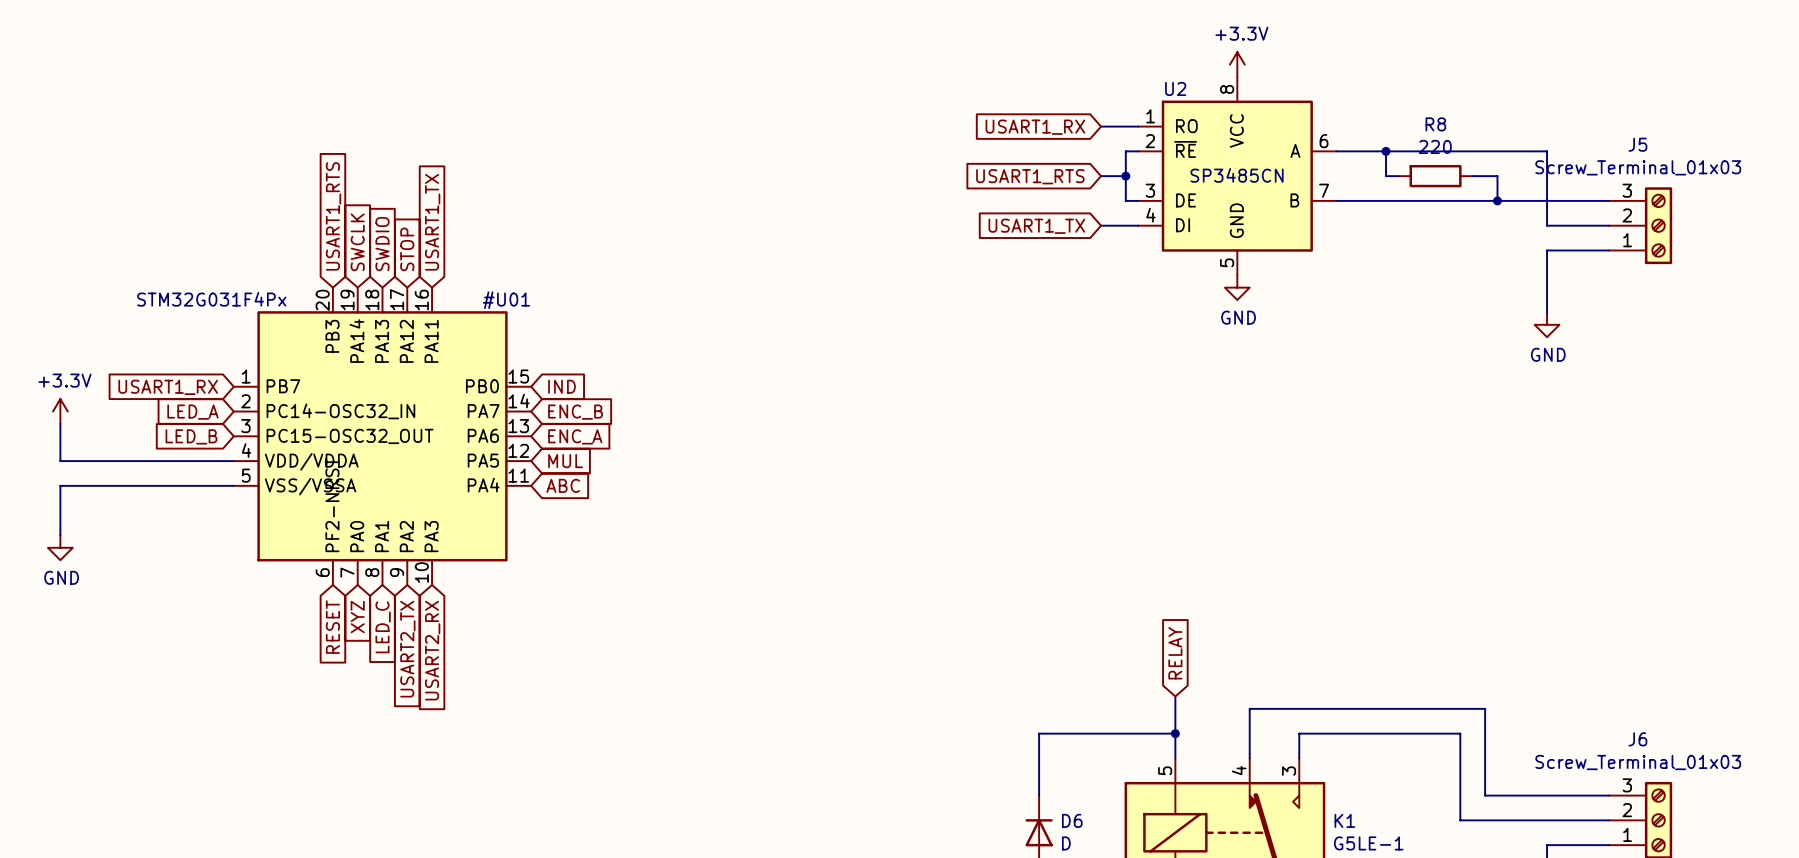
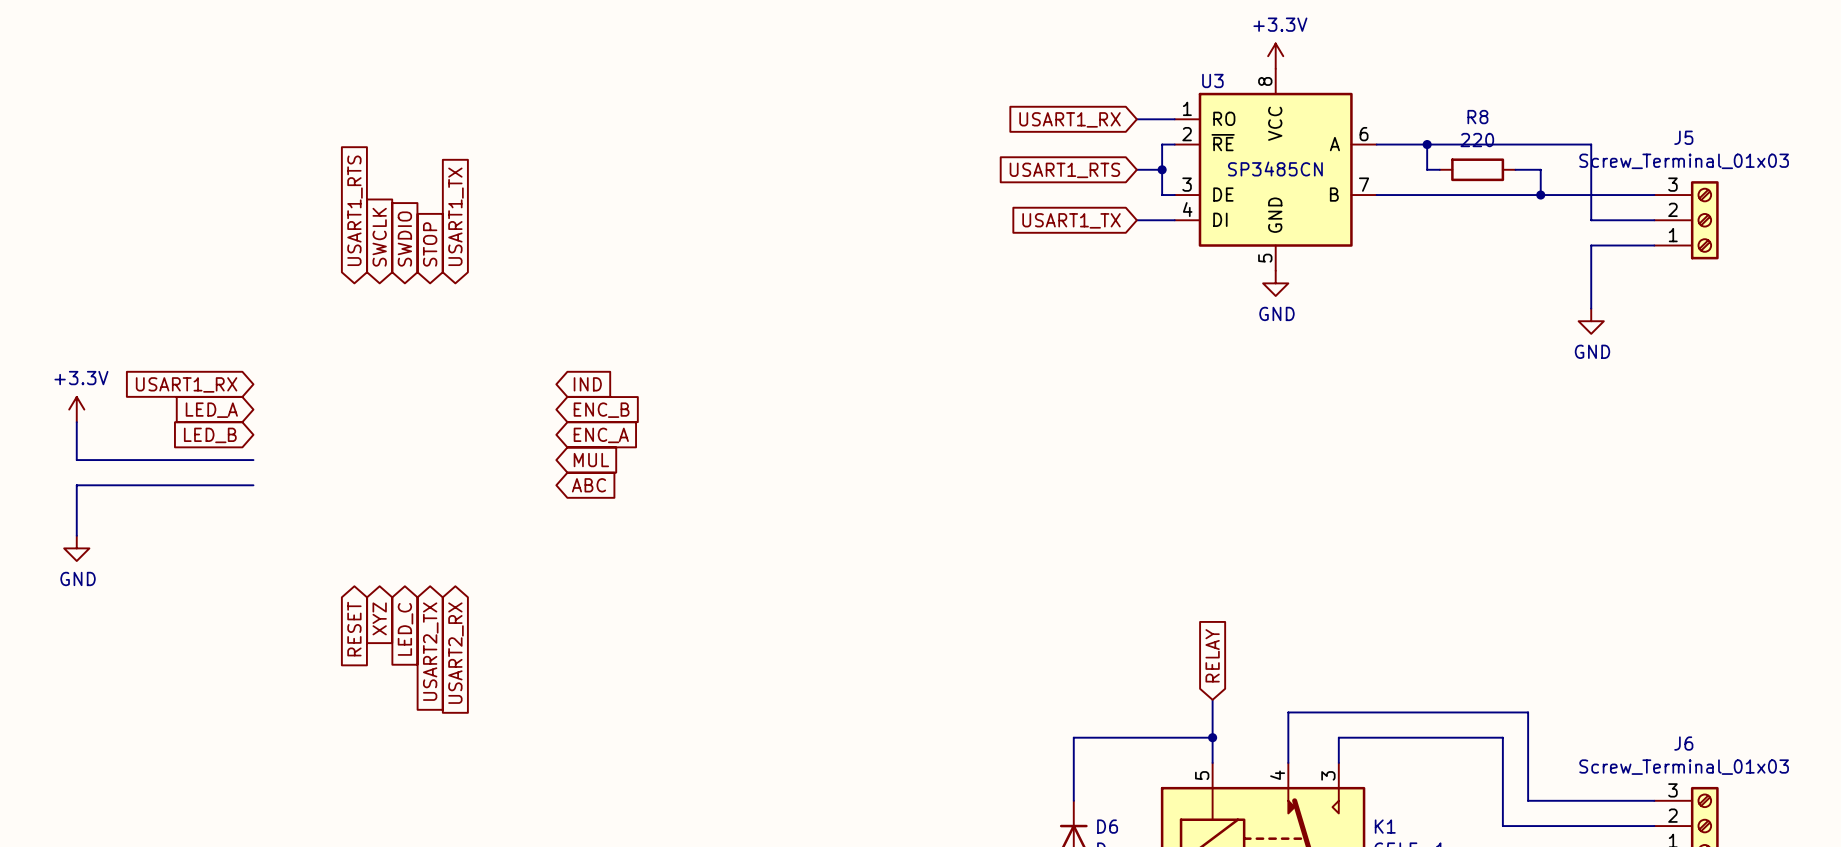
U2 name: U2 (1175, 88) -> U3 (1212, 80)
drawing: [233, 287, 532, 585] -> none

